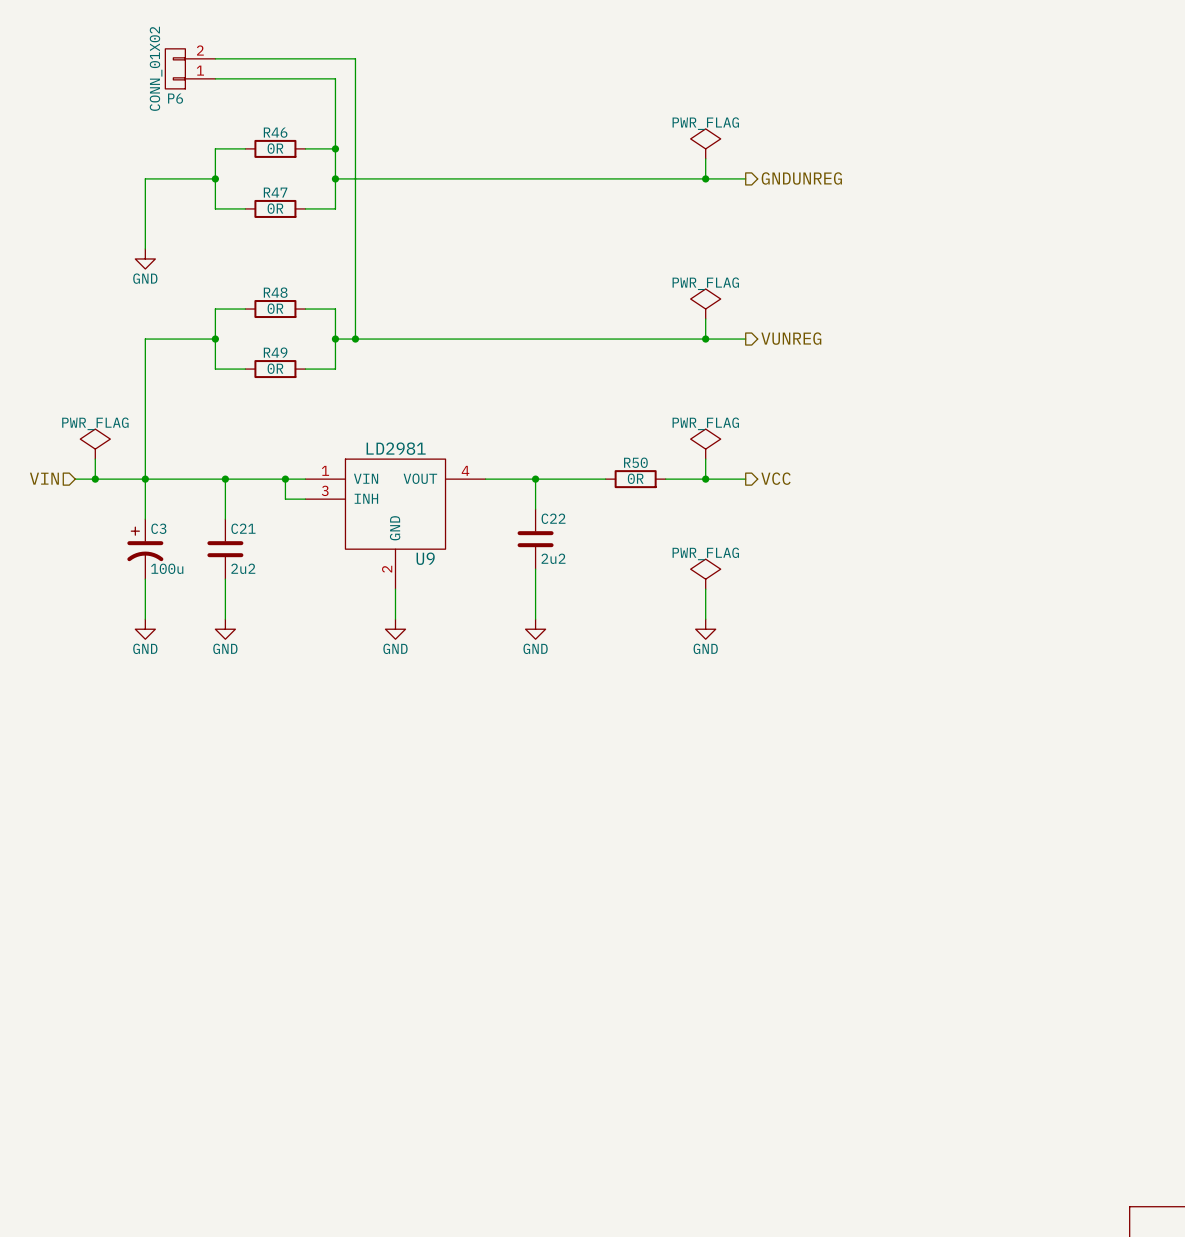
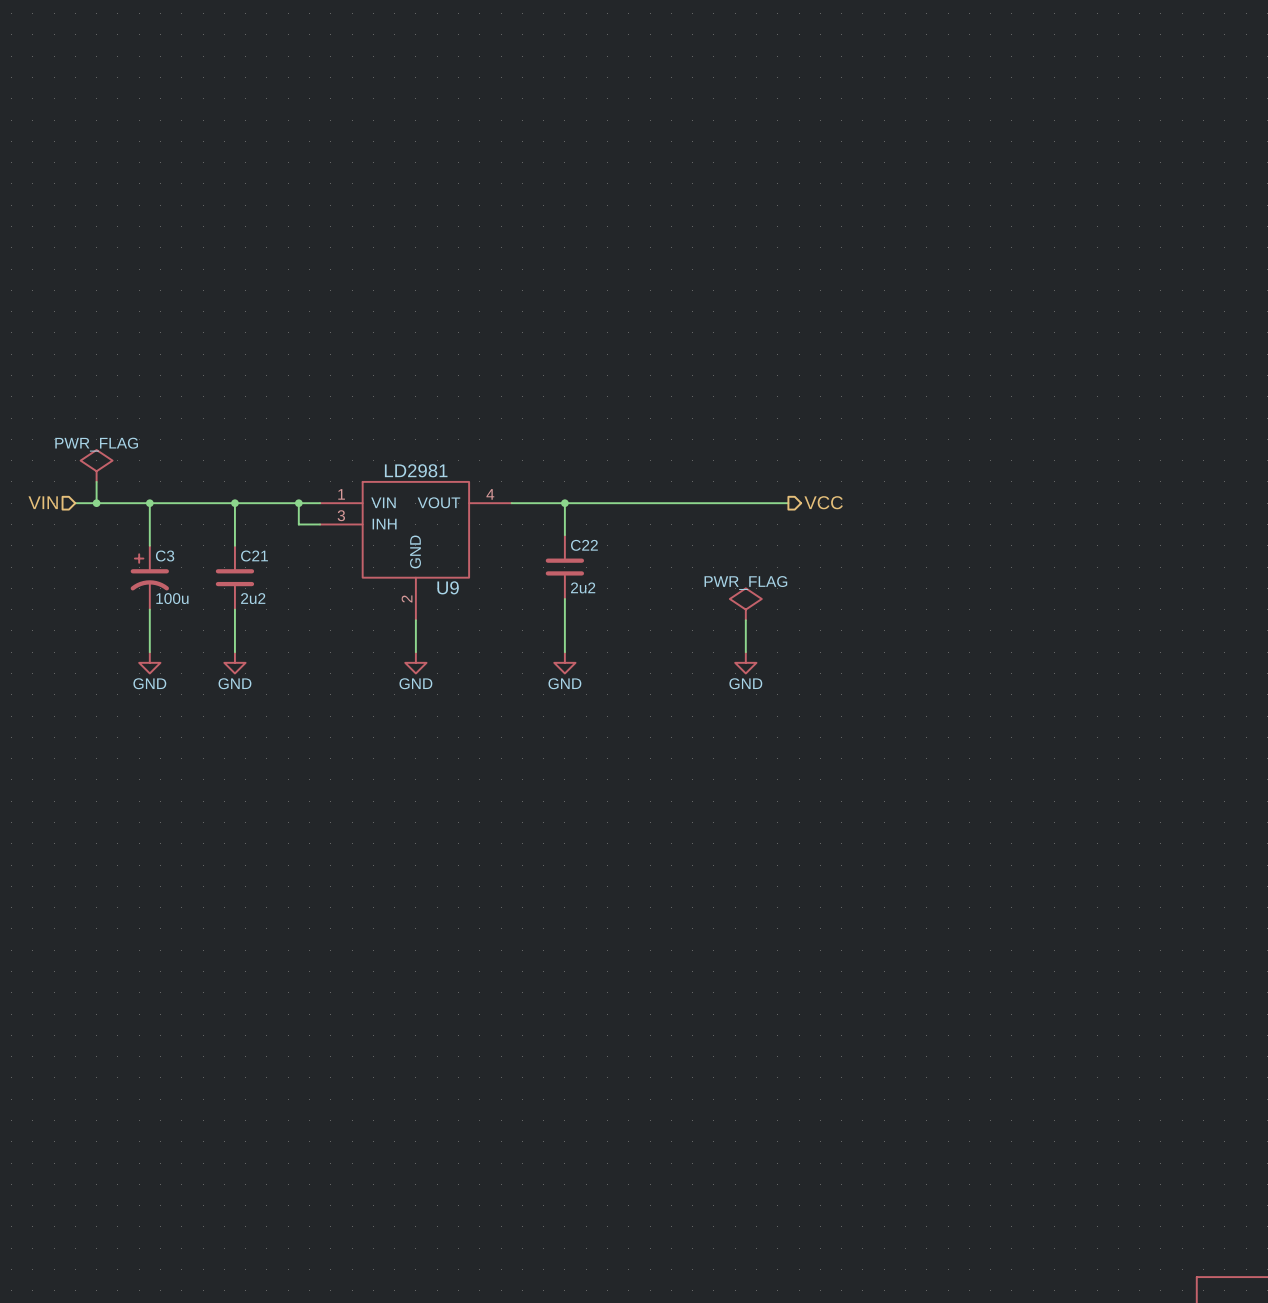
wire: (215, 58) (355, 58) (355, 339) -> none
P6: CONN_01X02 (190, 68) -> none
wire: (215, 78) (335, 78) (335, 208) (305, 208) -> none
power symbol: PWR_FLAG (705, 143) -> none
wire: (245, 148) (215, 148) (215, 208) (245, 208) -> none
R46: 0R (275, 148) -> none
wire: (305, 148) (335, 148) -> none
junction: (335, 148) -> none
wire: (705, 158) (705, 178) -> none
wire: (215, 178) (145, 178) (145, 248) -> none
junction: (215, 178) -> none
wire: (335, 178) (745, 178) -> none
junction: (335, 178) -> none
junction: (705, 178) -> none
hierarchical label: GNDUNREG (801, 178) -> none
R47: 0R (275, 208) -> none
power symbol: GND (145, 258) -> none
power symbol: PWR_FLAG (705, 304) -> none
wire: (245, 309) (215, 309) (215, 369) (245, 369) -> none
R48: 0R (275, 309) -> none
wire: (305, 309) (335, 309) (335, 369) (305, 369) -> none
wire: (705, 319) (705, 339) -> none
hierarchical label: VUNREG (791, 338) -> none
wire: (215, 339) (145, 339) (145, 479) -> none
junction: (215, 339) -> none
wire: (335, 339) (745, 339) -> none
junction: (335, 339) -> none
junction: (355, 339) -> none
junction: (705, 339) -> none
R49: 0R (275, 369) -> none
power symbol: PWR_FLAG (705, 444) -> none
wire: (705, 459) (705, 479) -> none
wire: none -> (639, 503) (703, 503)
R50: 0R (635, 479) -> none
junction: (705, 479) -> none

